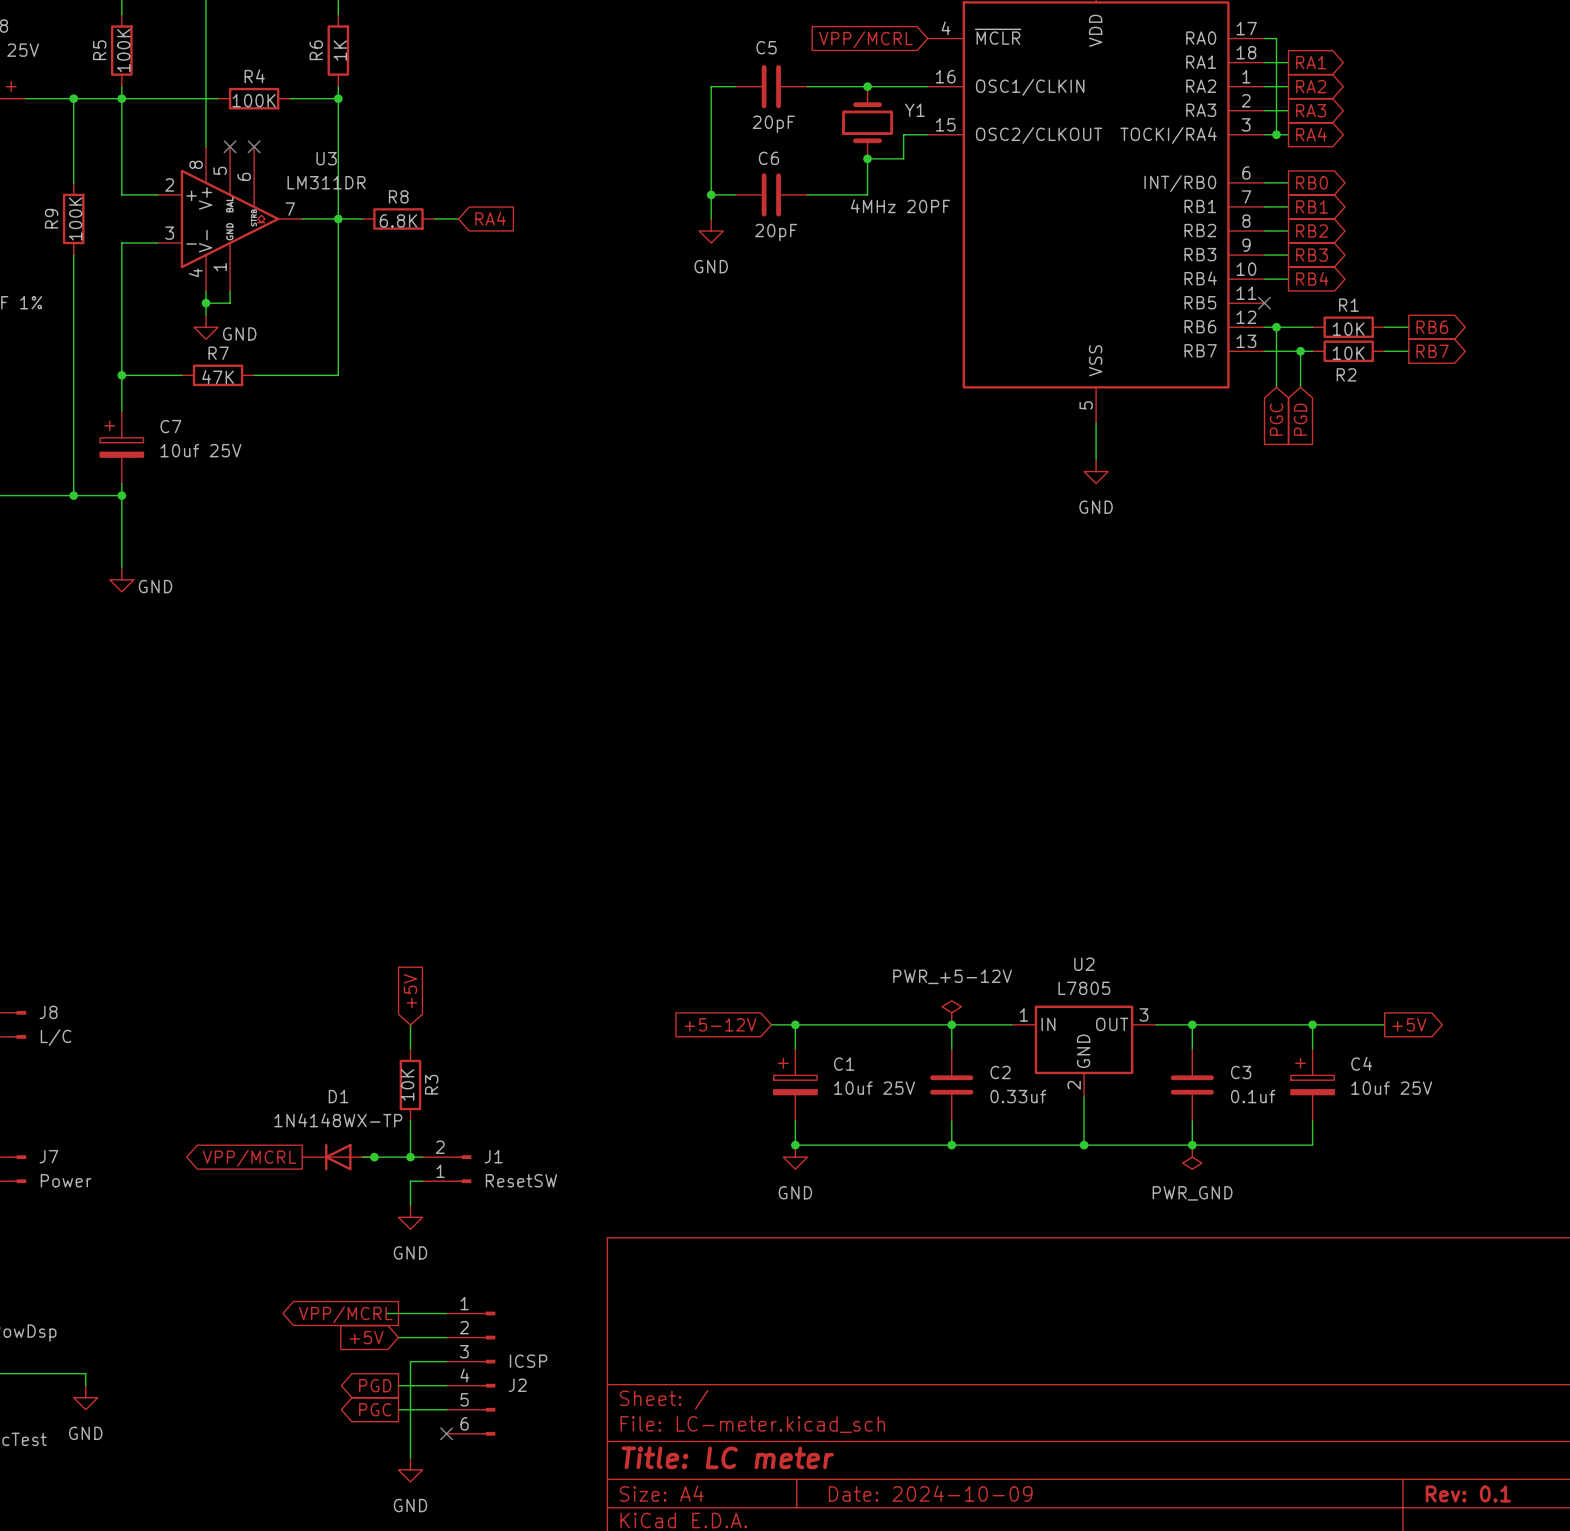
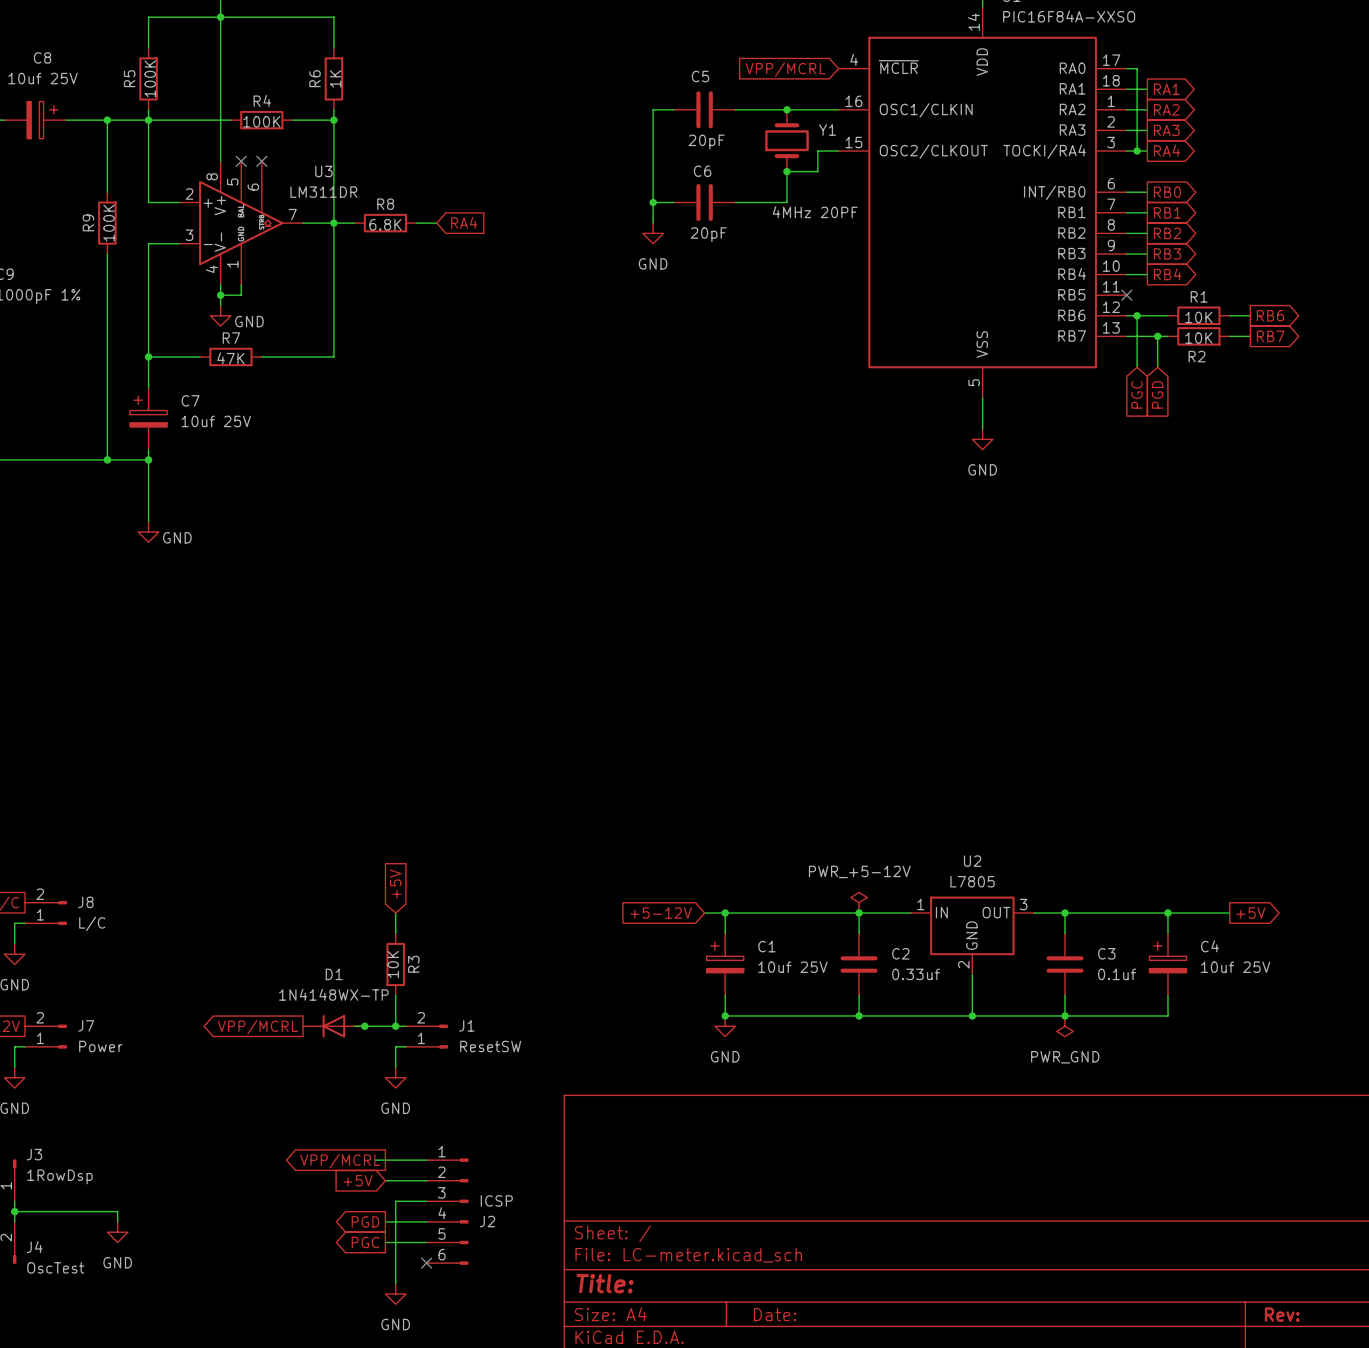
title block: Title: LC meter (727, 1457) -> Title: (605, 1283)
title block: Date: 2024-10-09 (930, 1493) -> Date: (775, 1314)
title block: Rev: 0.1 (1468, 1493) -> Rev: (1282, 1314)

